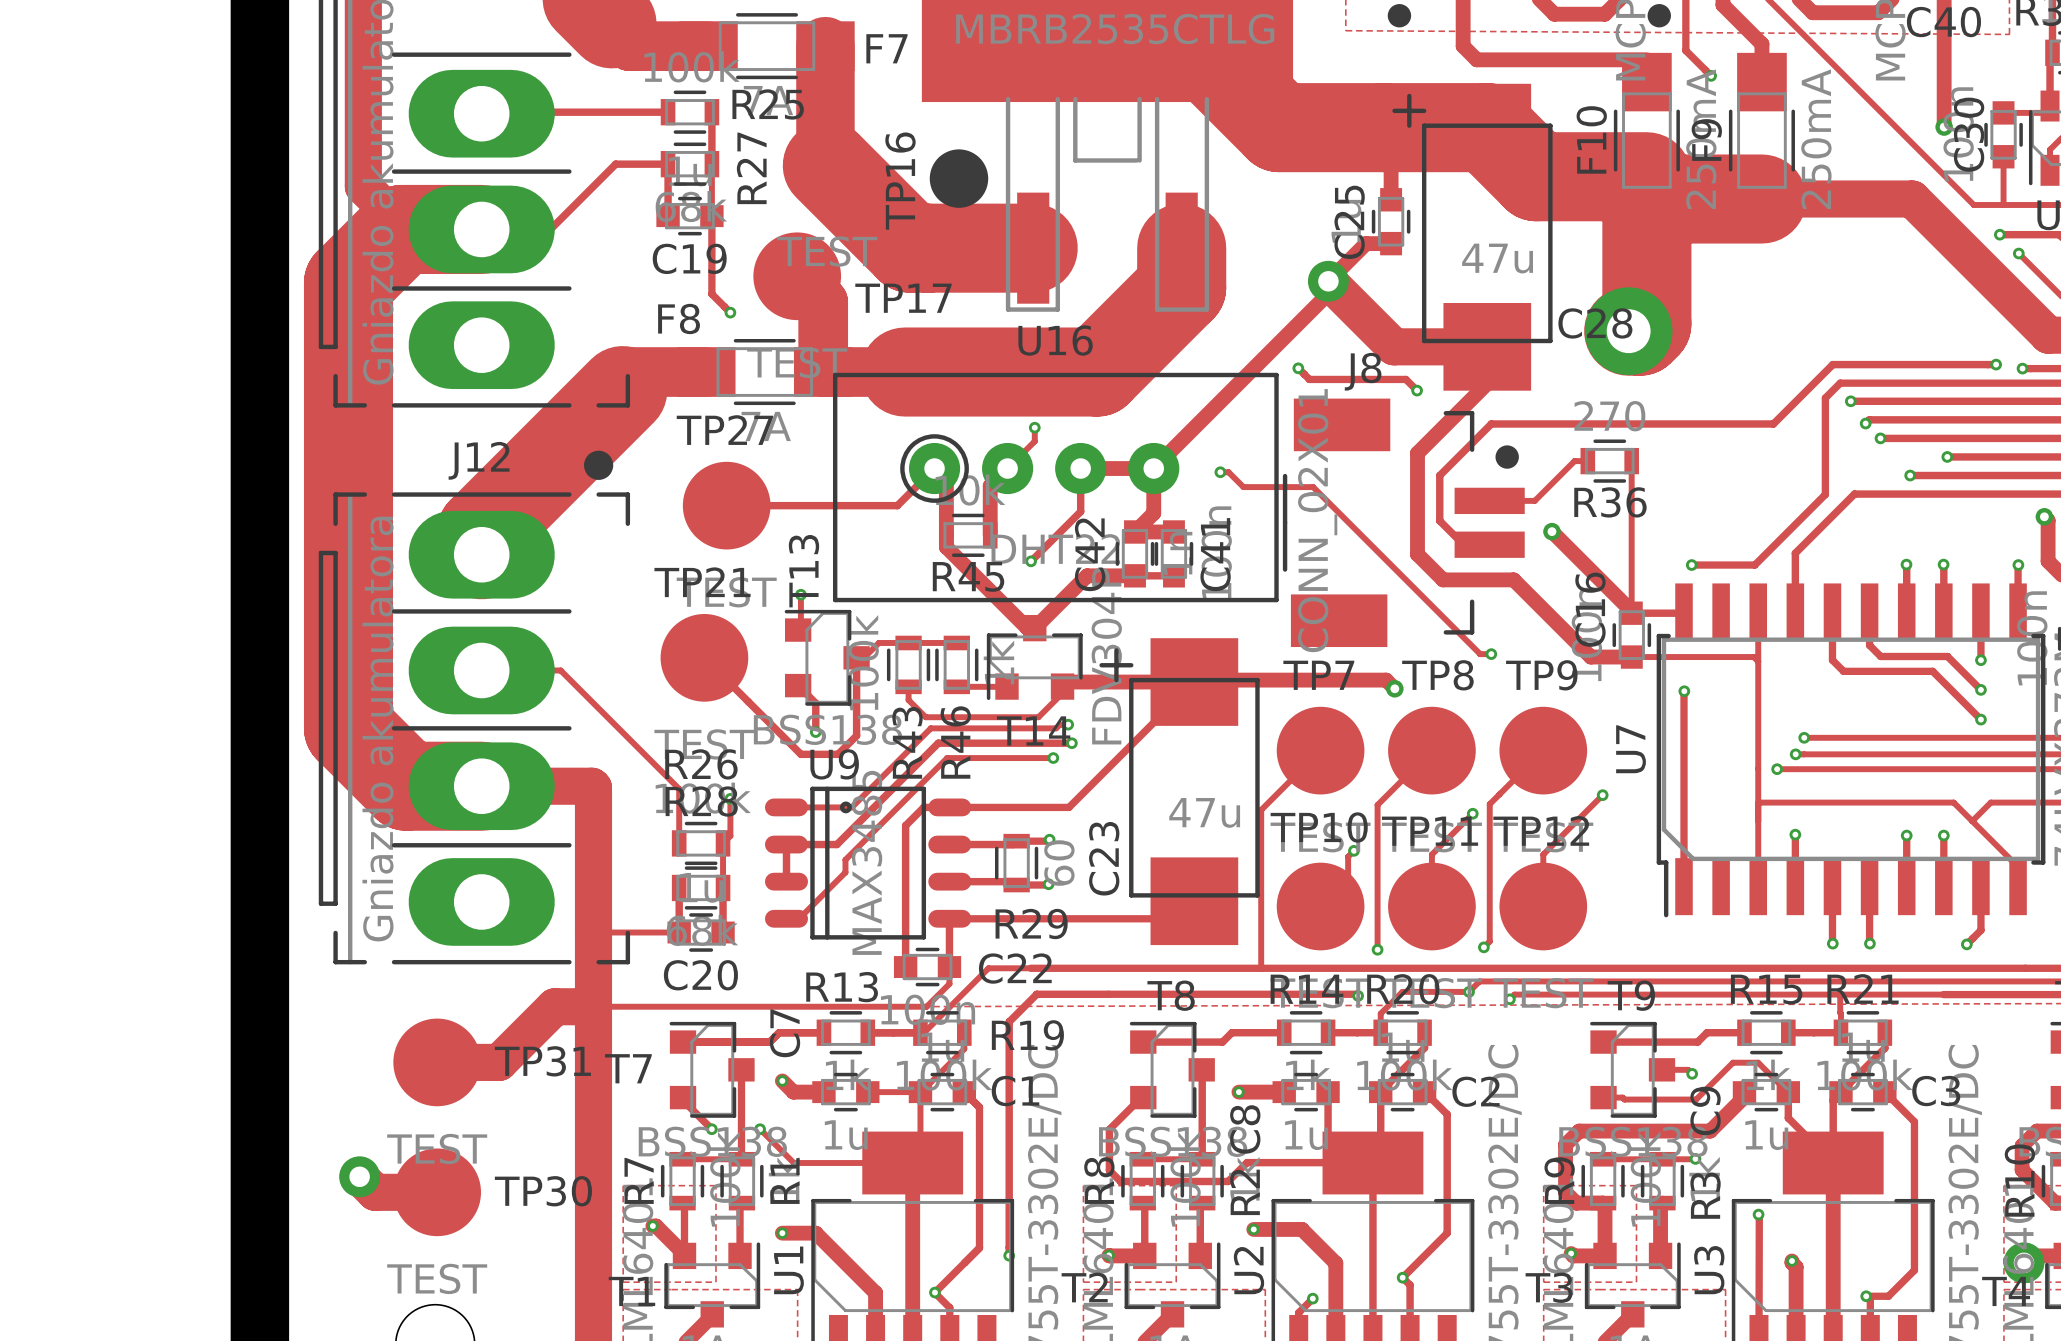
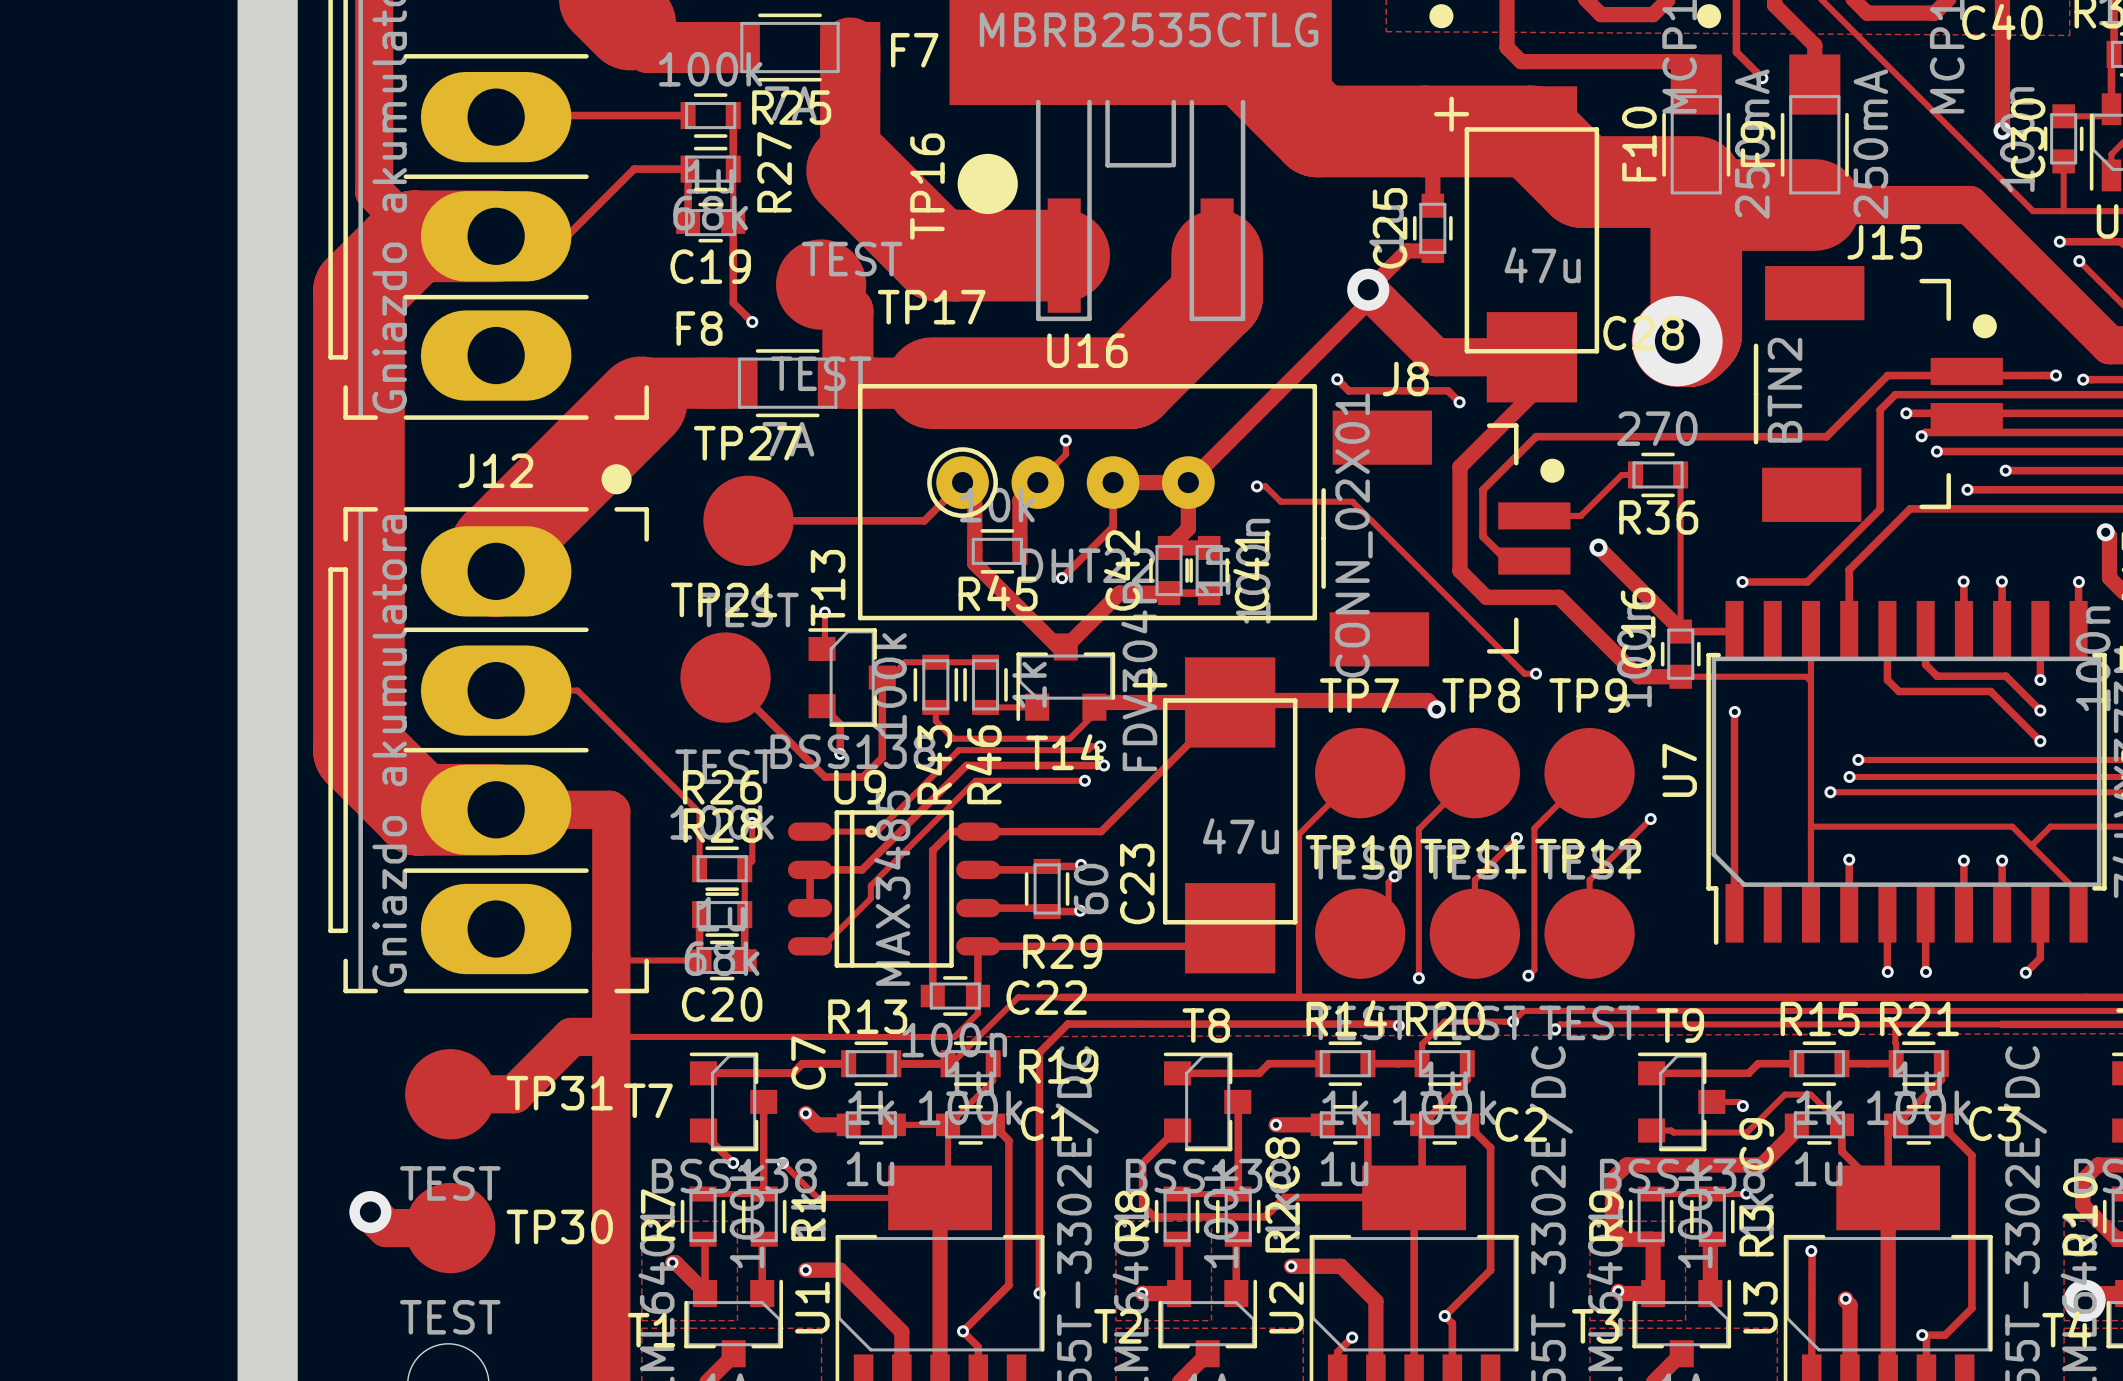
J15: none -> BTN2 (1878, 393)

